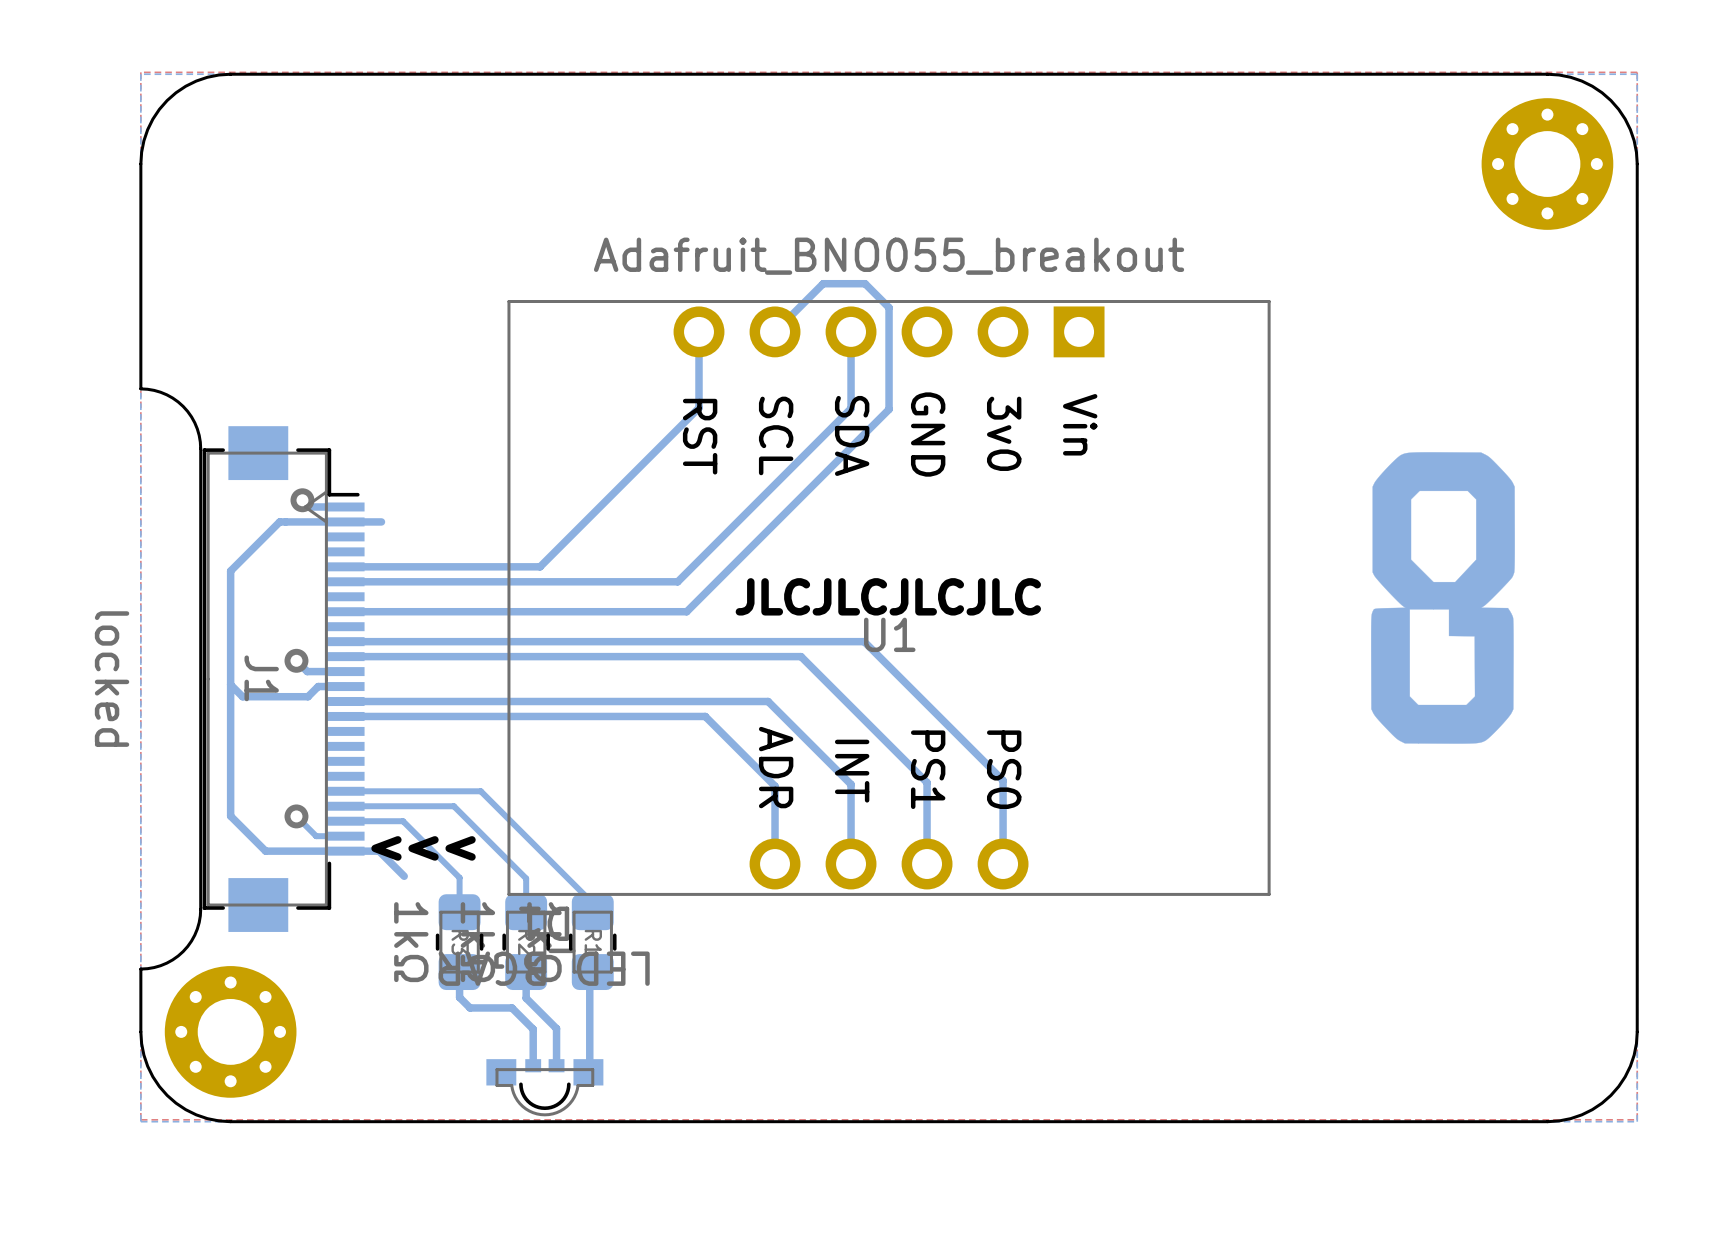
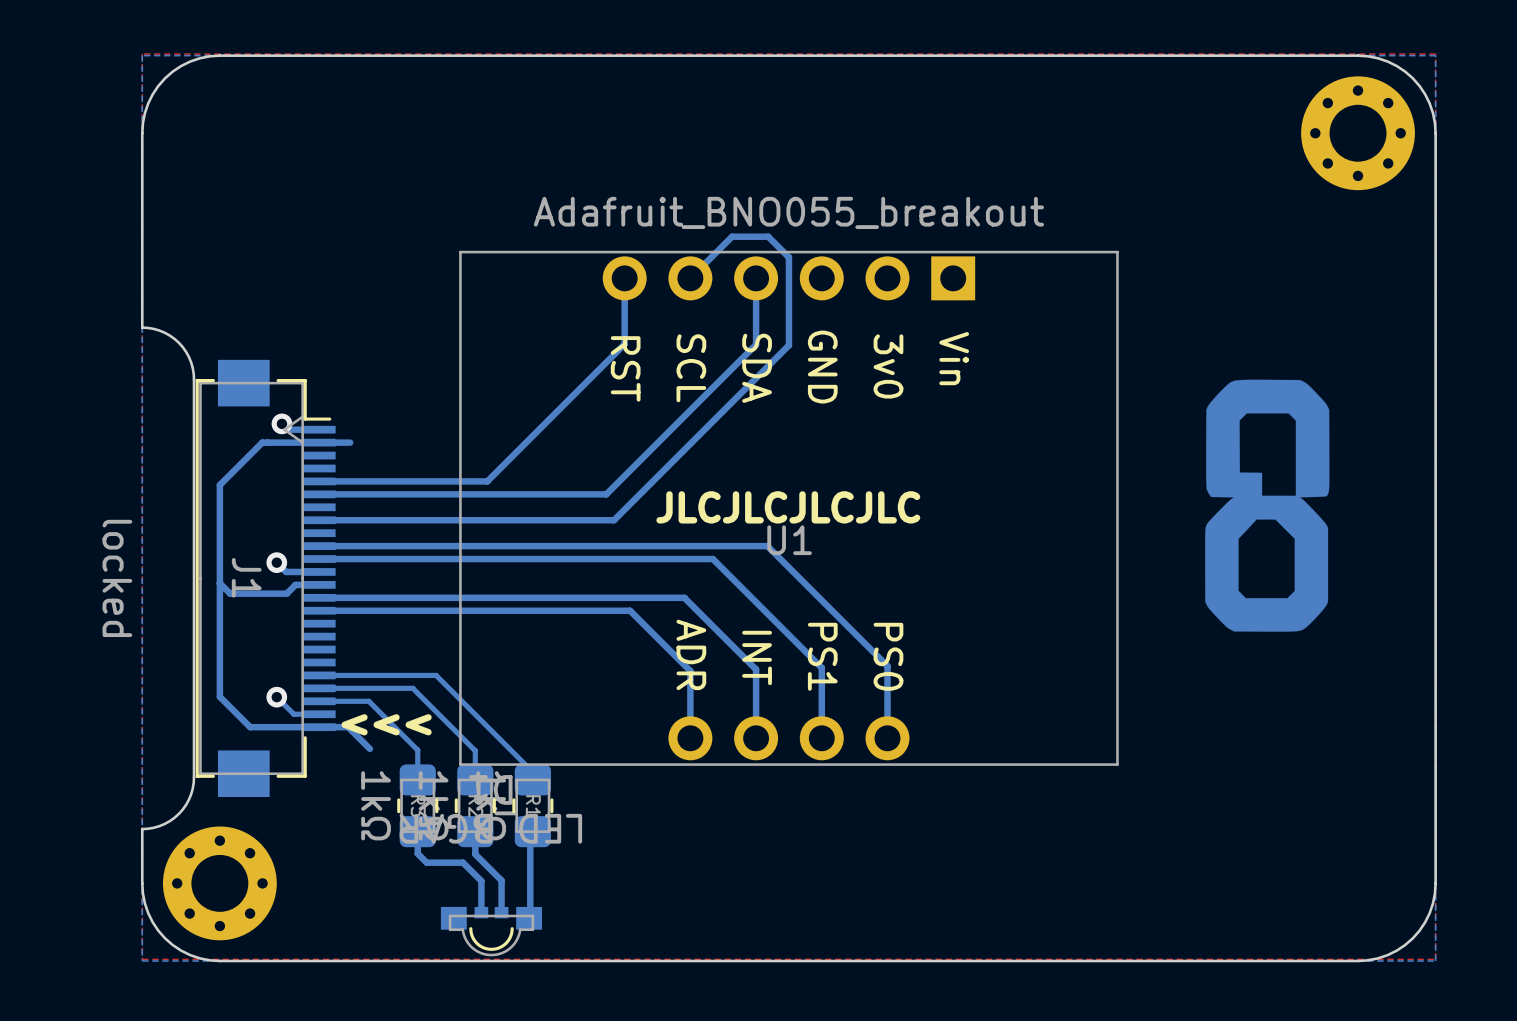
drawing shape: [1371, 452, 1515, 744] -> [1205, 379, 1330, 632]

